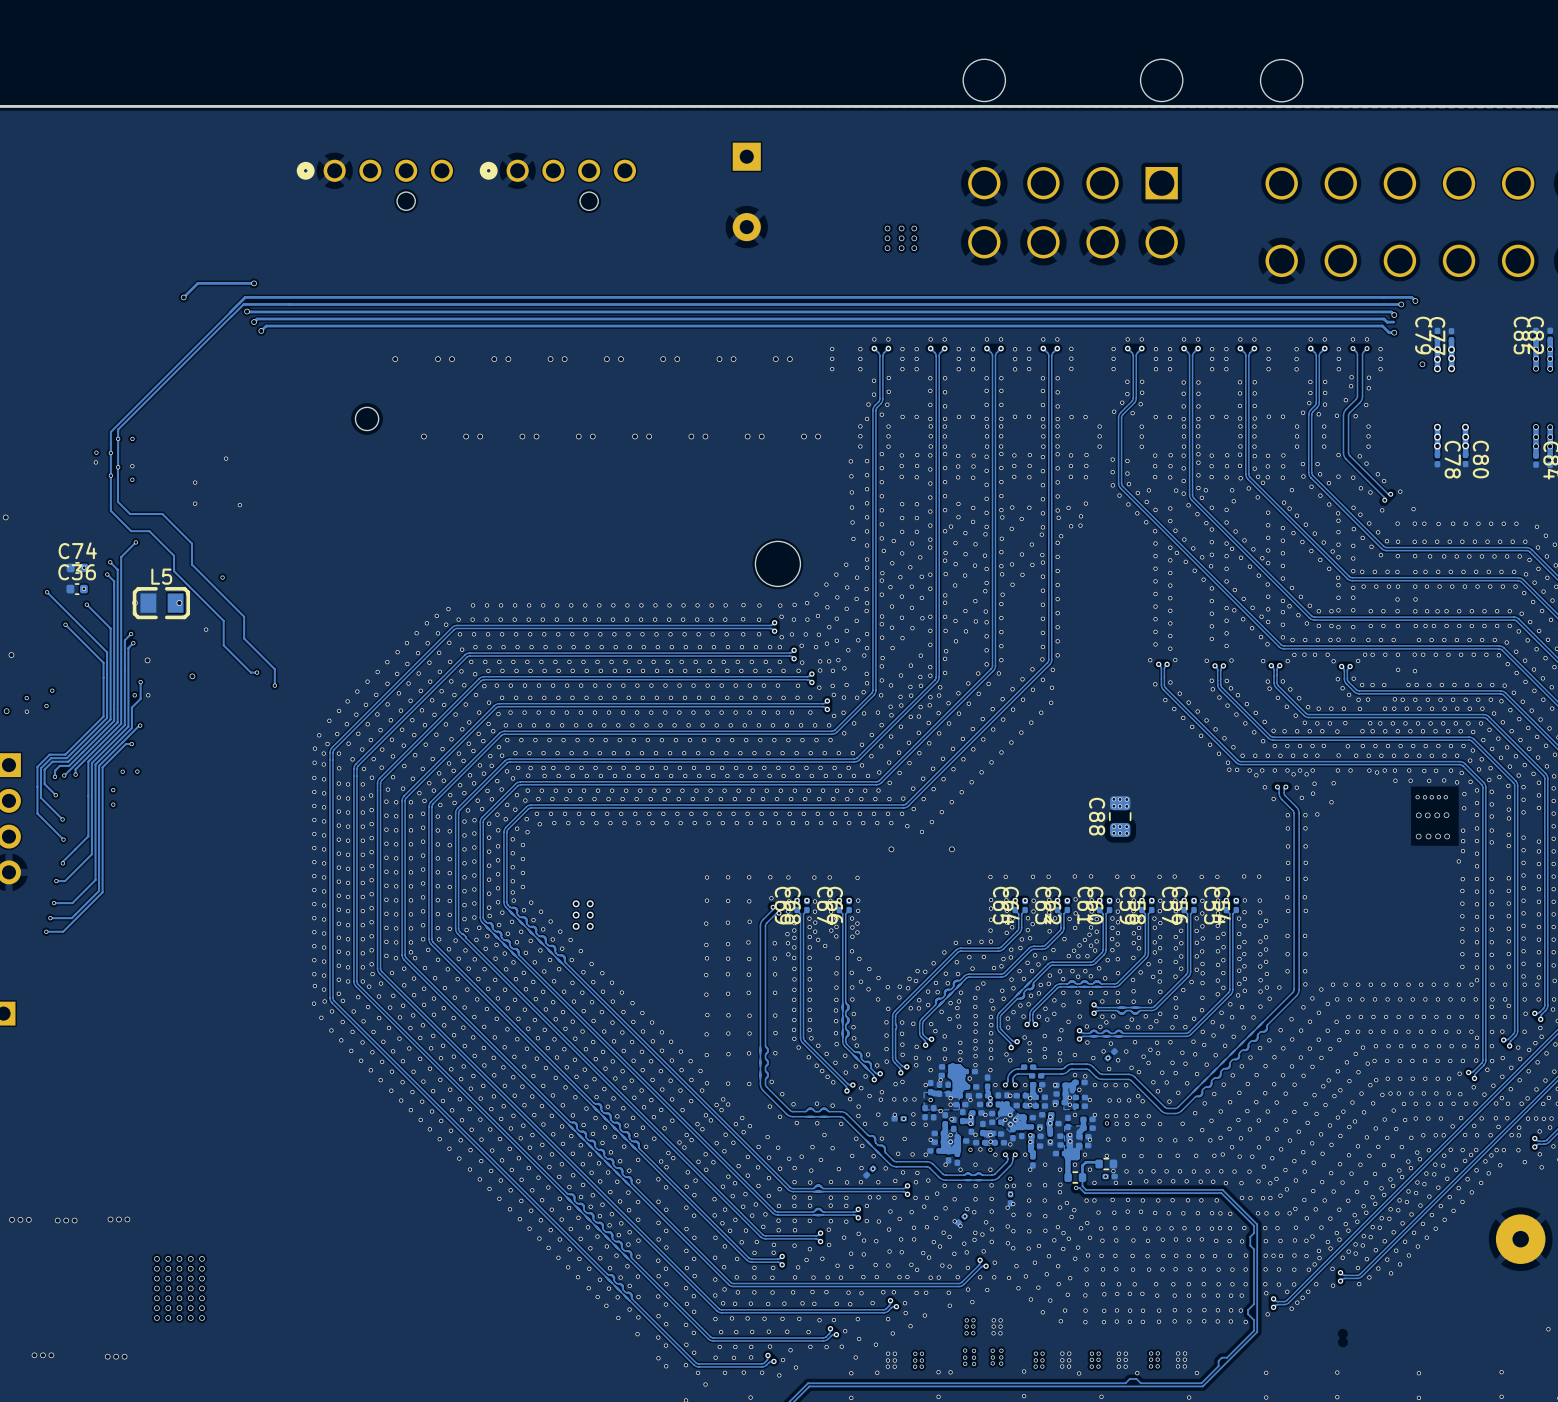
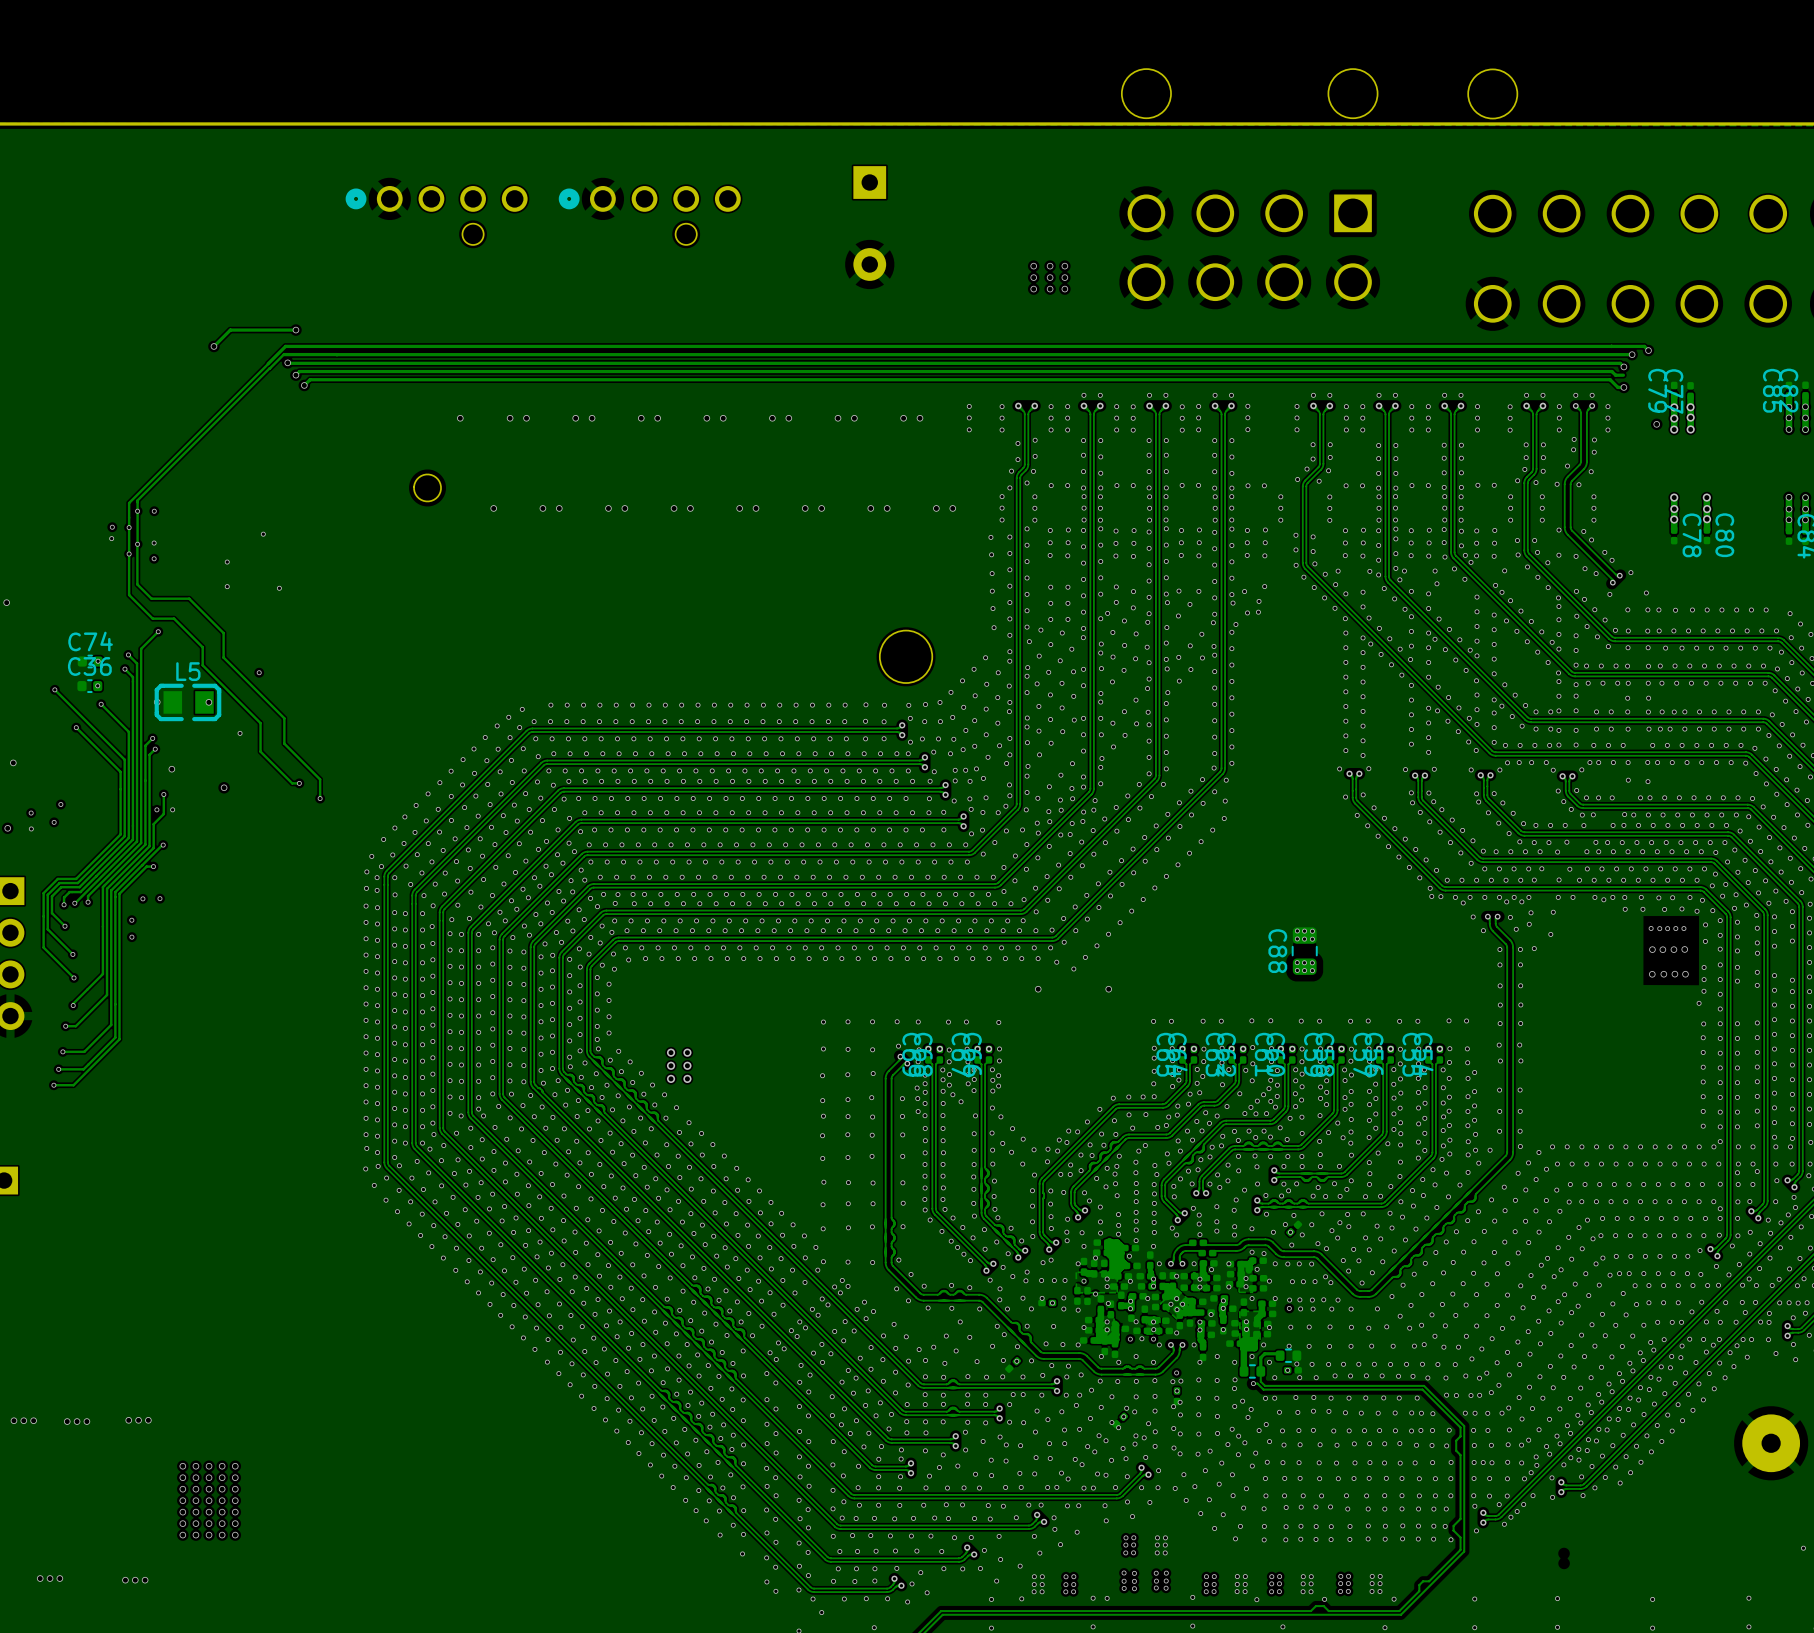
via: (874, 339) -> none
via: (888, 339) -> none

